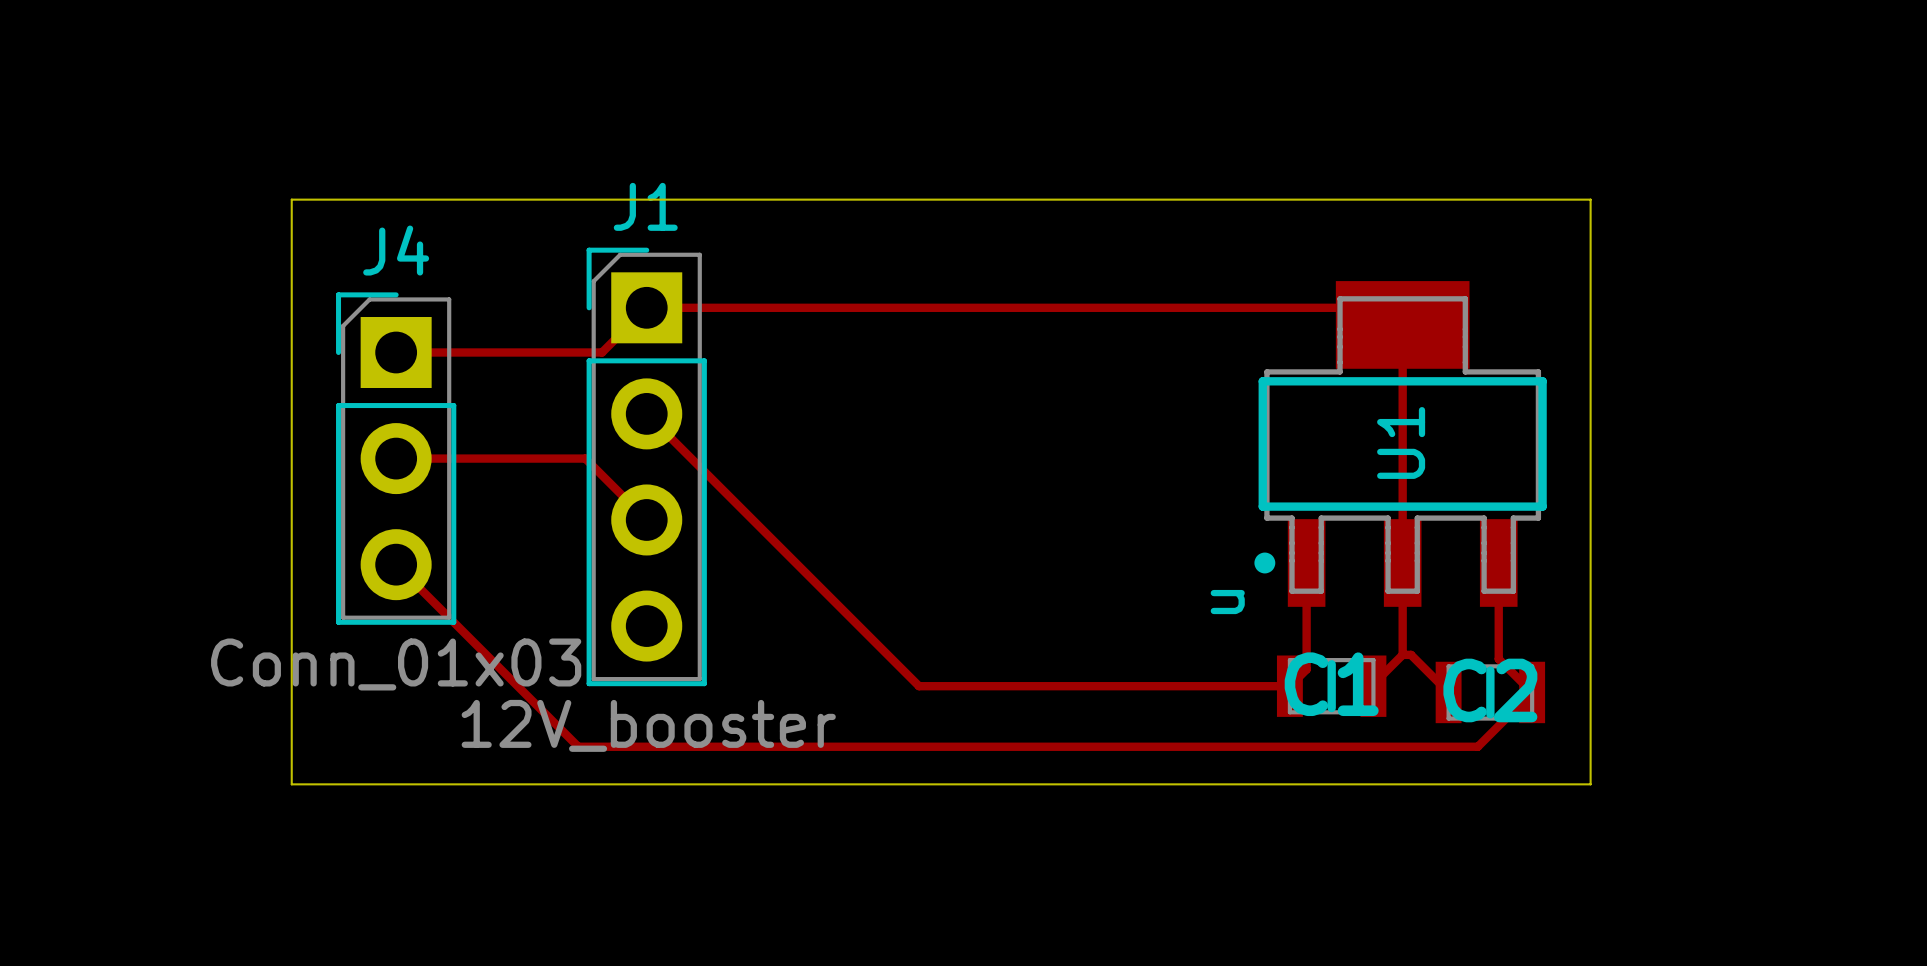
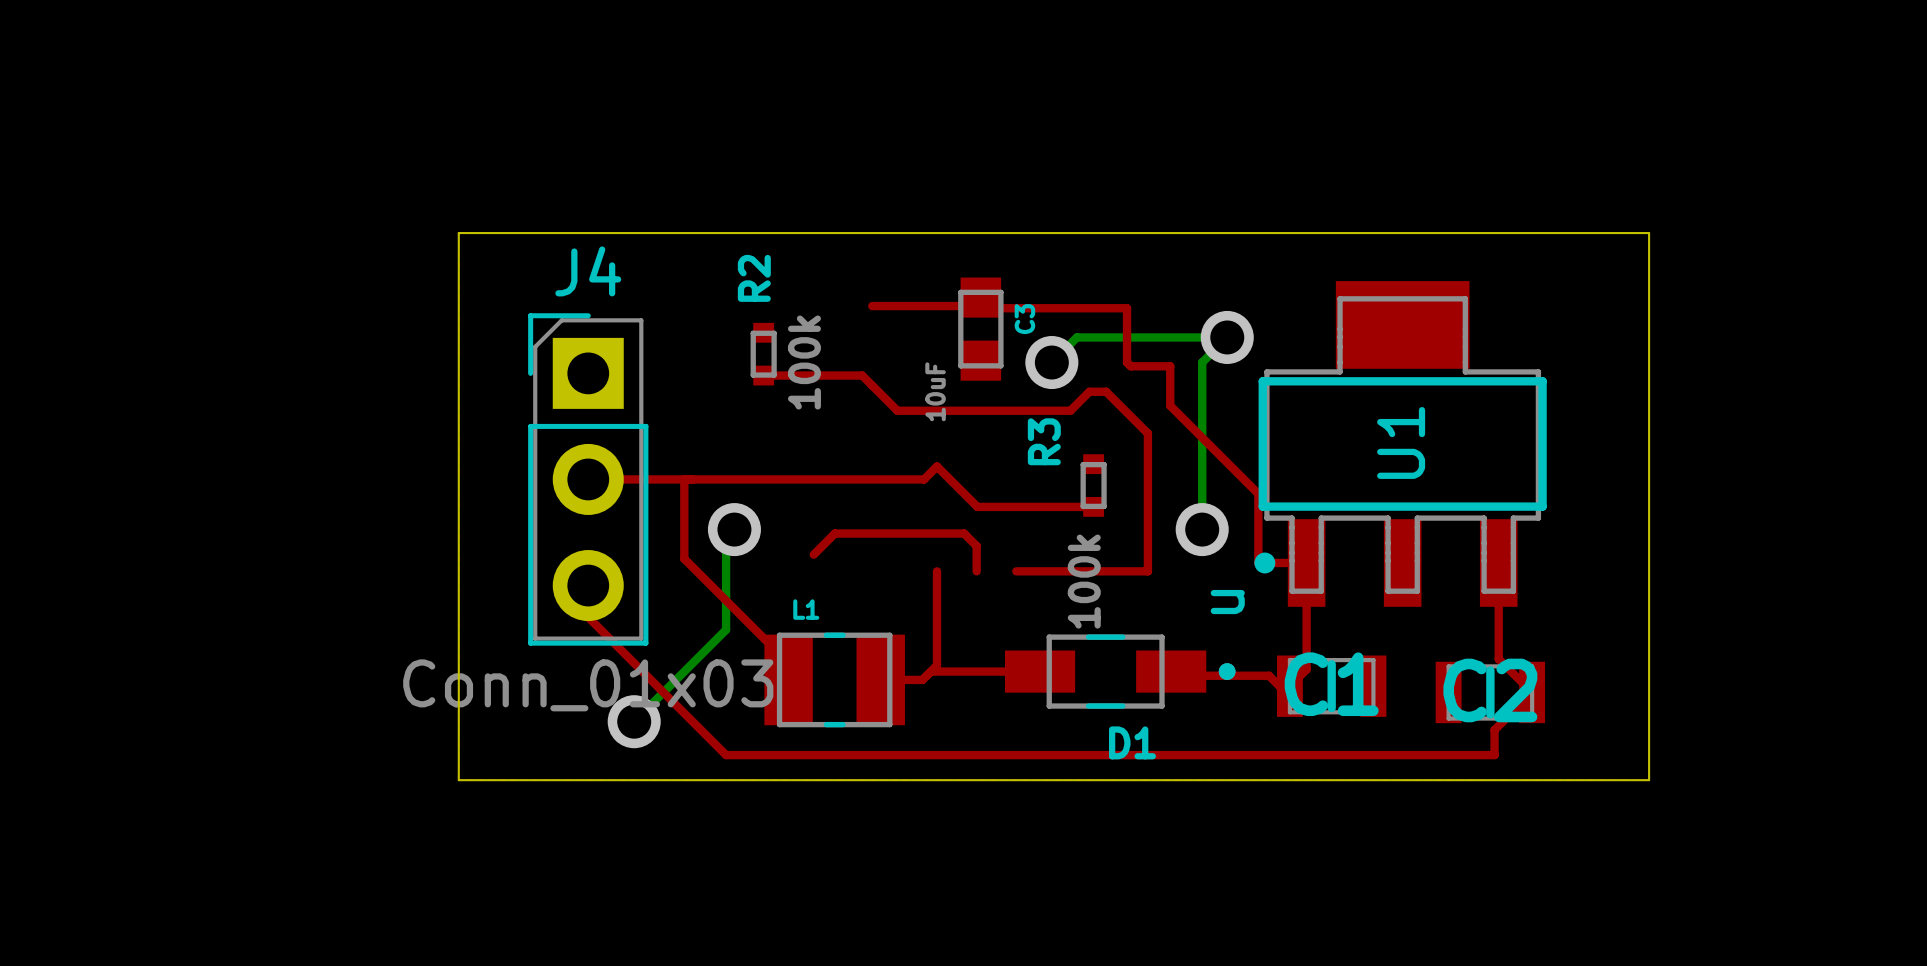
board edge: (291, 199) (1590, 199) (1590, 784) (291, 784) (291, 199) -> (458, 233) (458, 780) (1649, 780) (1649, 233) (458, 233)
top track: none -> (872, 306) (972, 306) (980, 297) (986, 297) (997, 308) (1127, 308) (1127, 362) (1130, 366) (1170, 366) (1170, 405) (1258, 493) (1258, 562) (1306, 562)
C3: none -> 10uF (980, 329)
via: none -> (1227, 337)
top track: (396, 352) (602, 352) (646, 307) (1385, 307) (1402, 324) (1402, 654) -> none
R2: none -> 100k (763, 354)
bottom track: none -> (1051, 362) (1076, 337) (1227, 337) (1202, 362) (1202, 529)
via: none -> (1051, 362)
top track: none -> (763, 375) (862, 375) (897, 410) (1070, 410) (1089, 391) (1106, 391) (1147, 433) (1147, 571) (1016, 571)
top track: (646, 413) (919, 686) (1279, 686) -> (1187, 675) (1269, 675) (1279, 686)
top track: (396, 458) (585, 458) (646, 519) -> none
J4 position: (396, 458) -> (588, 479)
top track: none -> (600, 466) (588, 479) (924, 479) (937, 466) (977, 506) (1093, 506)
J1: 12V_booster (646, 466) -> none
top track: none -> (684, 479) (684, 558) (788, 663) (788, 679)
R3: none -> 100k (1093, 485)
bottom track: none -> (734, 529) (734, 535) (726, 543) (726, 629) (634, 721)
via: none -> (734, 529)
via: none -> (1202, 529)
top track: none -> (813, 554) (834, 533) (964, 533) (976, 546) (976, 571)
top track: (396, 564) (578, 746) (1477, 746) (1494, 730) -> (588, 585) (588, 617) (726, 755) (1494, 755) (1494, 730)
top track: none -> (937, 571) (937, 665) (922, 679) (880, 679)
top track: (1402, 654) (1373, 684) -> none
top track: (1402, 654) (1411, 654) (1448, 692) -> none
top track: none -> (930, 671) (1040, 671)
D1: none -> (1120, 671)
L1: none -> (834, 679)
via: none -> (634, 721)

